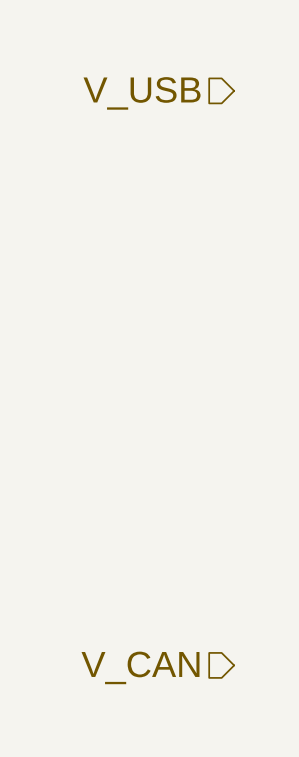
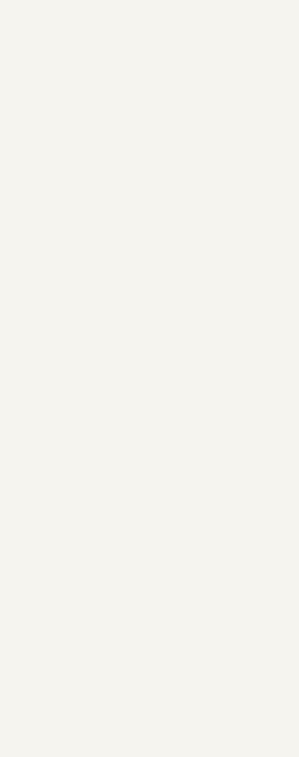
hierarchical label: V_USB (142, 93) -> none
hierarchical label: V_CAN (140, 667) -> none

